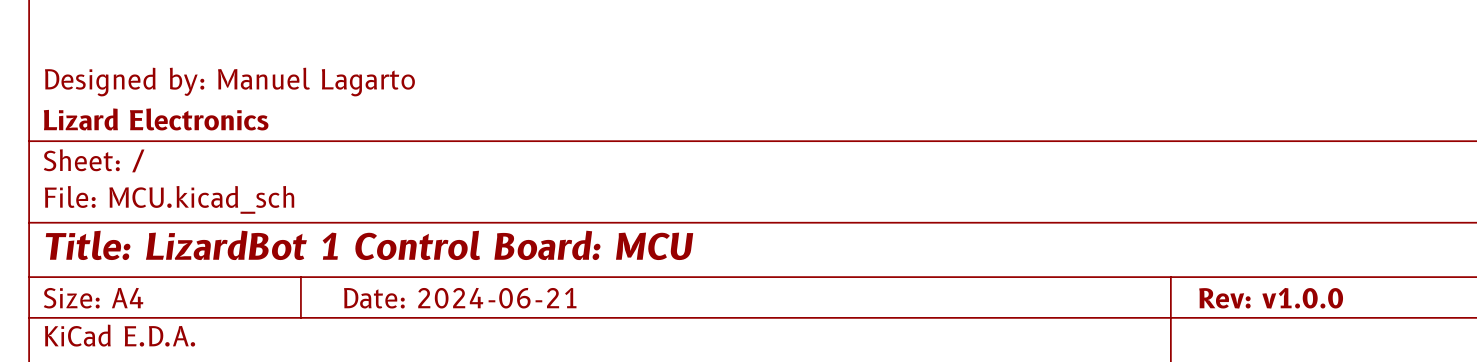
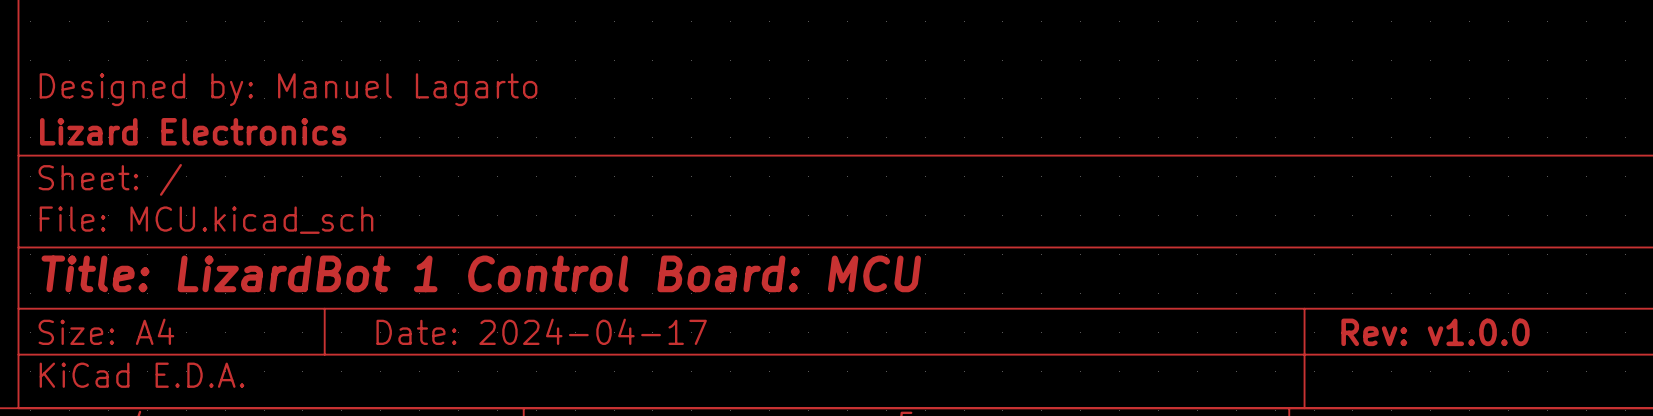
title block: Date: 2024-06-21 (460, 298) -> Date: 2024-04-17 (541, 331)

